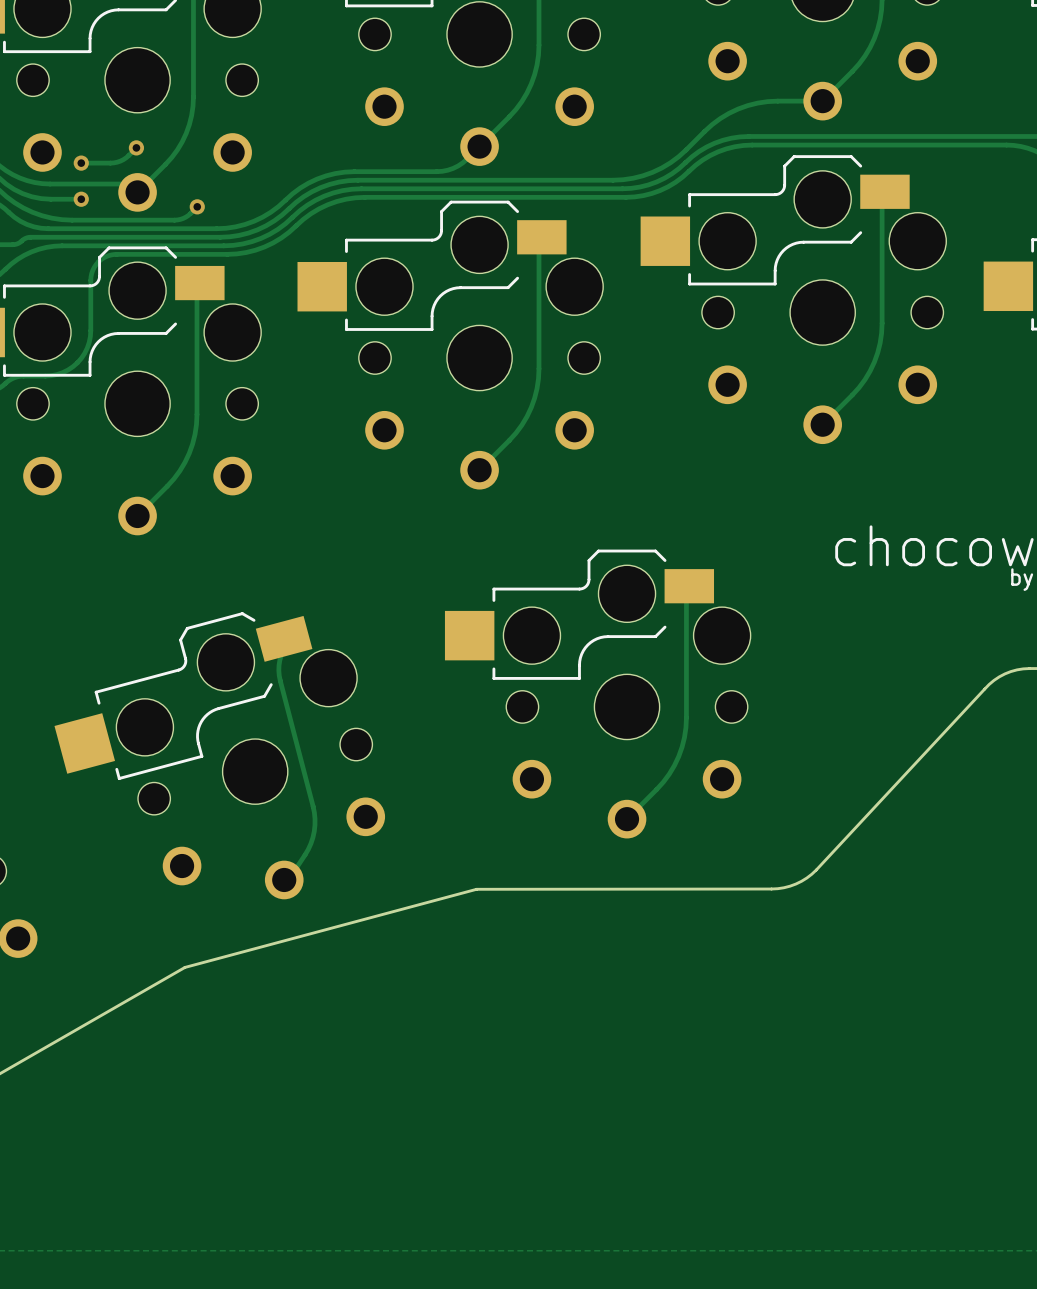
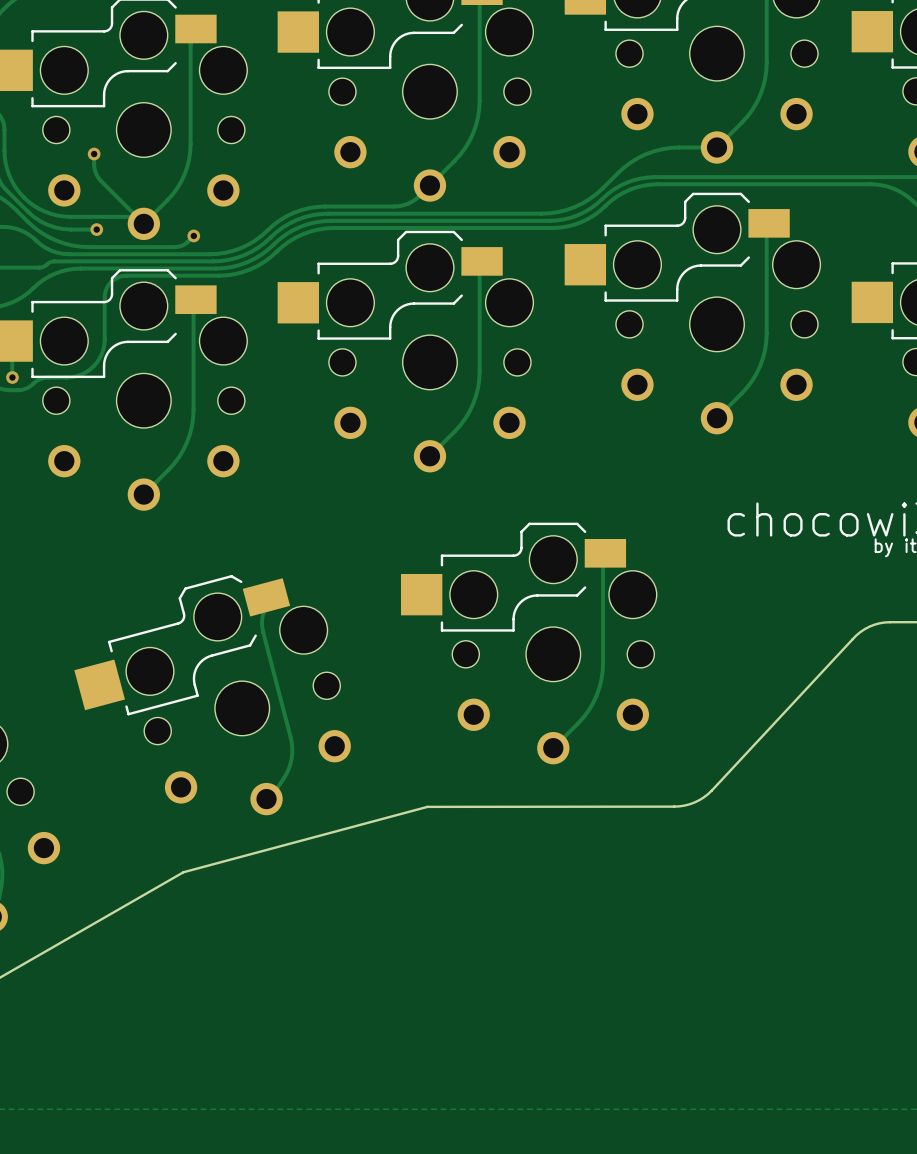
track: none -> (94, 154) (94, 170) (99, 178) (140, 220)
via: none -> (94, 154)
track: (136, 147) (126, 157) (117, 162) (81, 163) -> none
via: (136, 147) -> none
via: (81, 163) -> none

